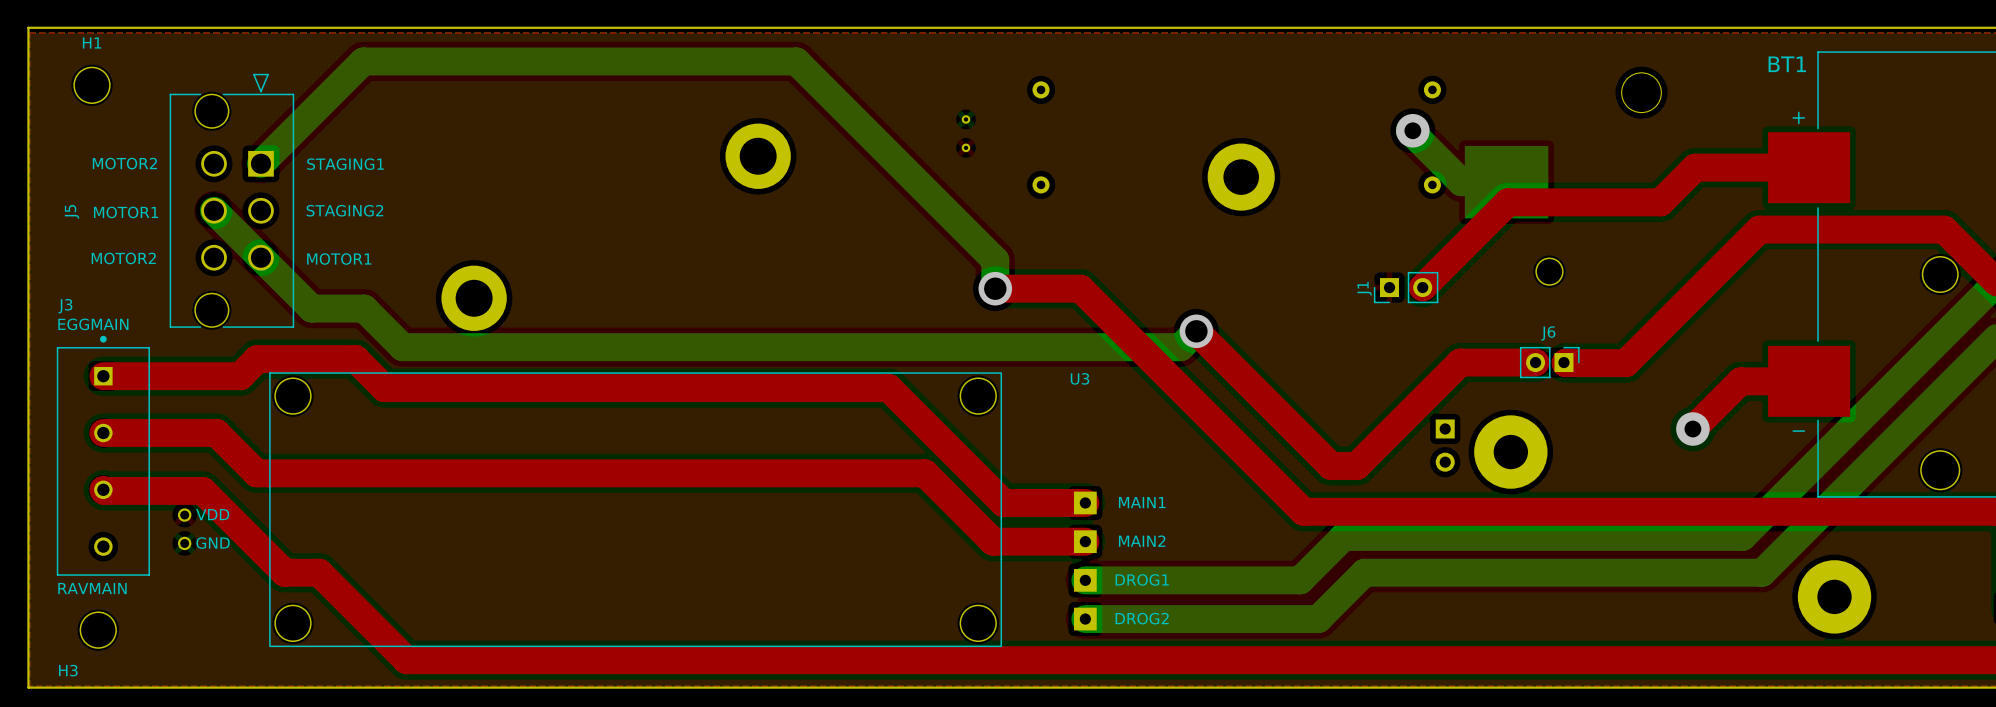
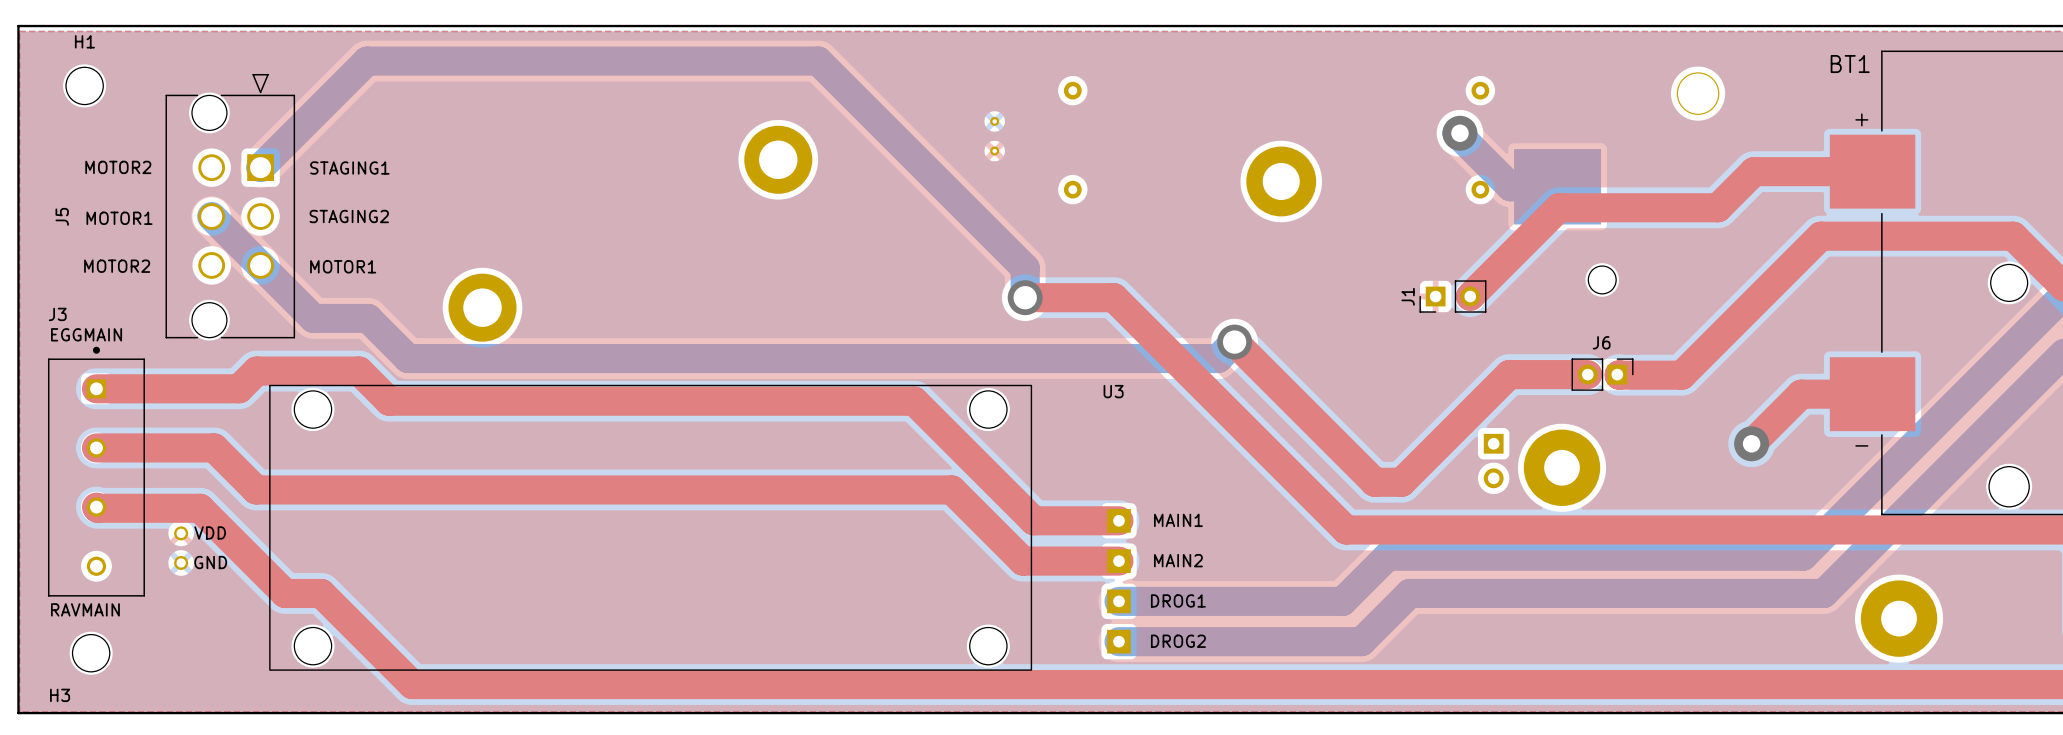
U3 footprint: [177, 372, 1097, 648] -> [174, 384, 1131, 671]

